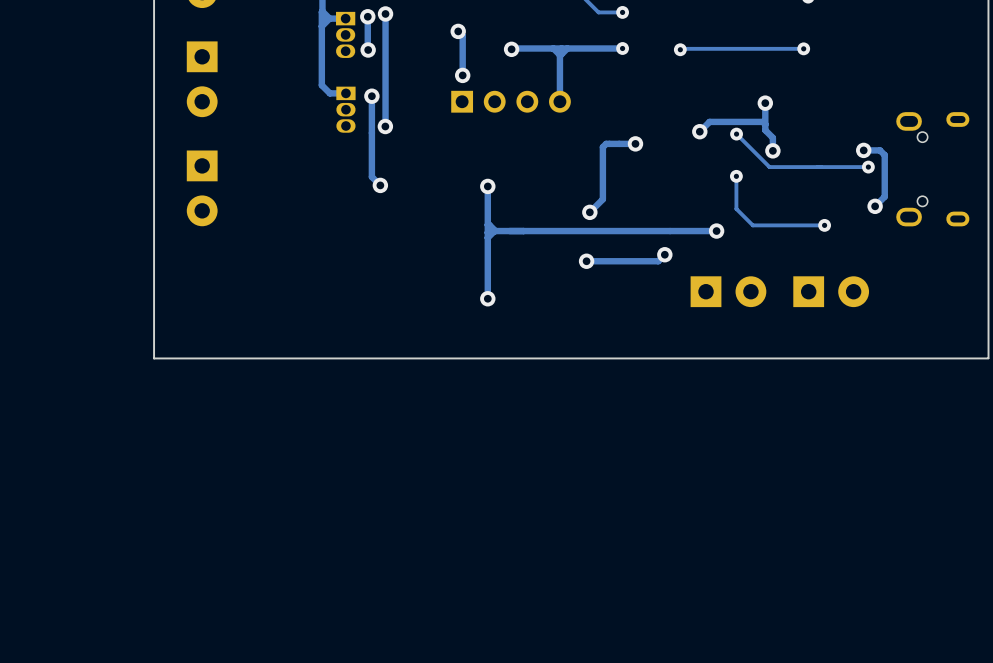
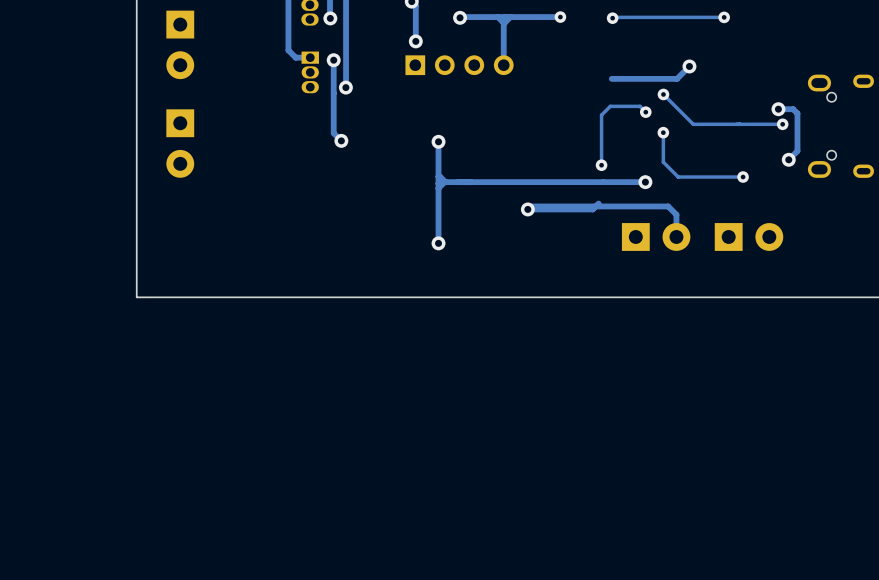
track: (765, 103) (765, 130) (772, 137) (772, 150) -> (689, 66) (677, 78) (611, 78)
track: (765, 124) (762, 121) (709, 121) (699, 131) -> none
via: (699, 131) -> none
track: (635, 143) (606, 143) (602, 147) (602, 199) (589, 212) -> none
via: (635, 143) -> none
via: (772, 150) -> none
track: none -> (645, 112) (639, 106) (610, 106) (601, 115) (601, 165)
via: none -> (645, 112)
via: (589, 212) -> none
via: none -> (601, 165)
via: (664, 254) -> none
track: none -> (528, 206) (668, 206) (676, 214) (676, 236)

